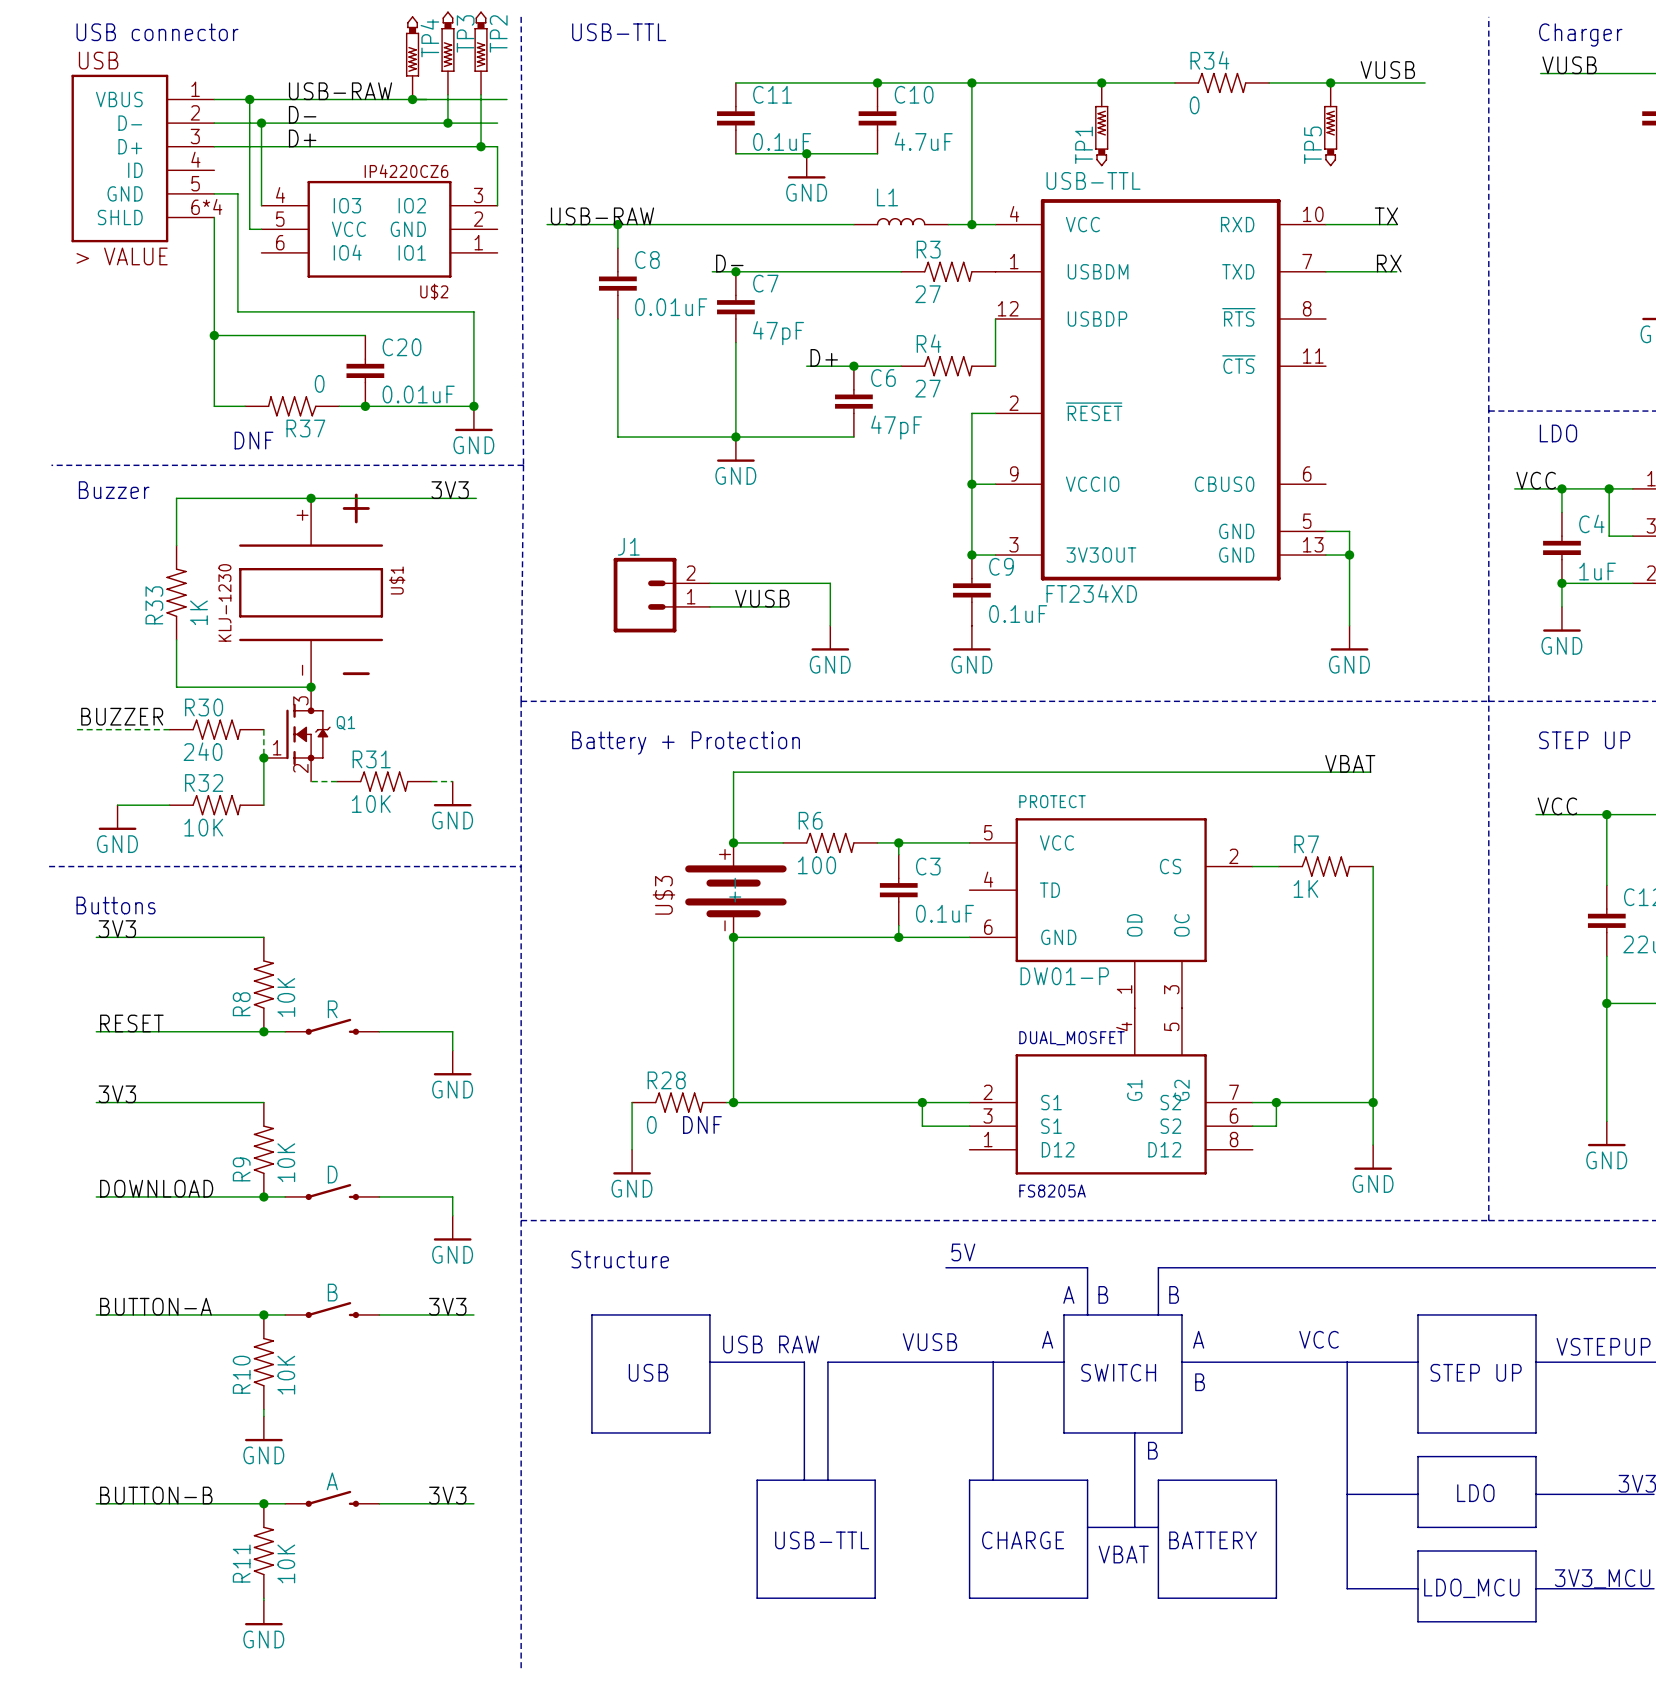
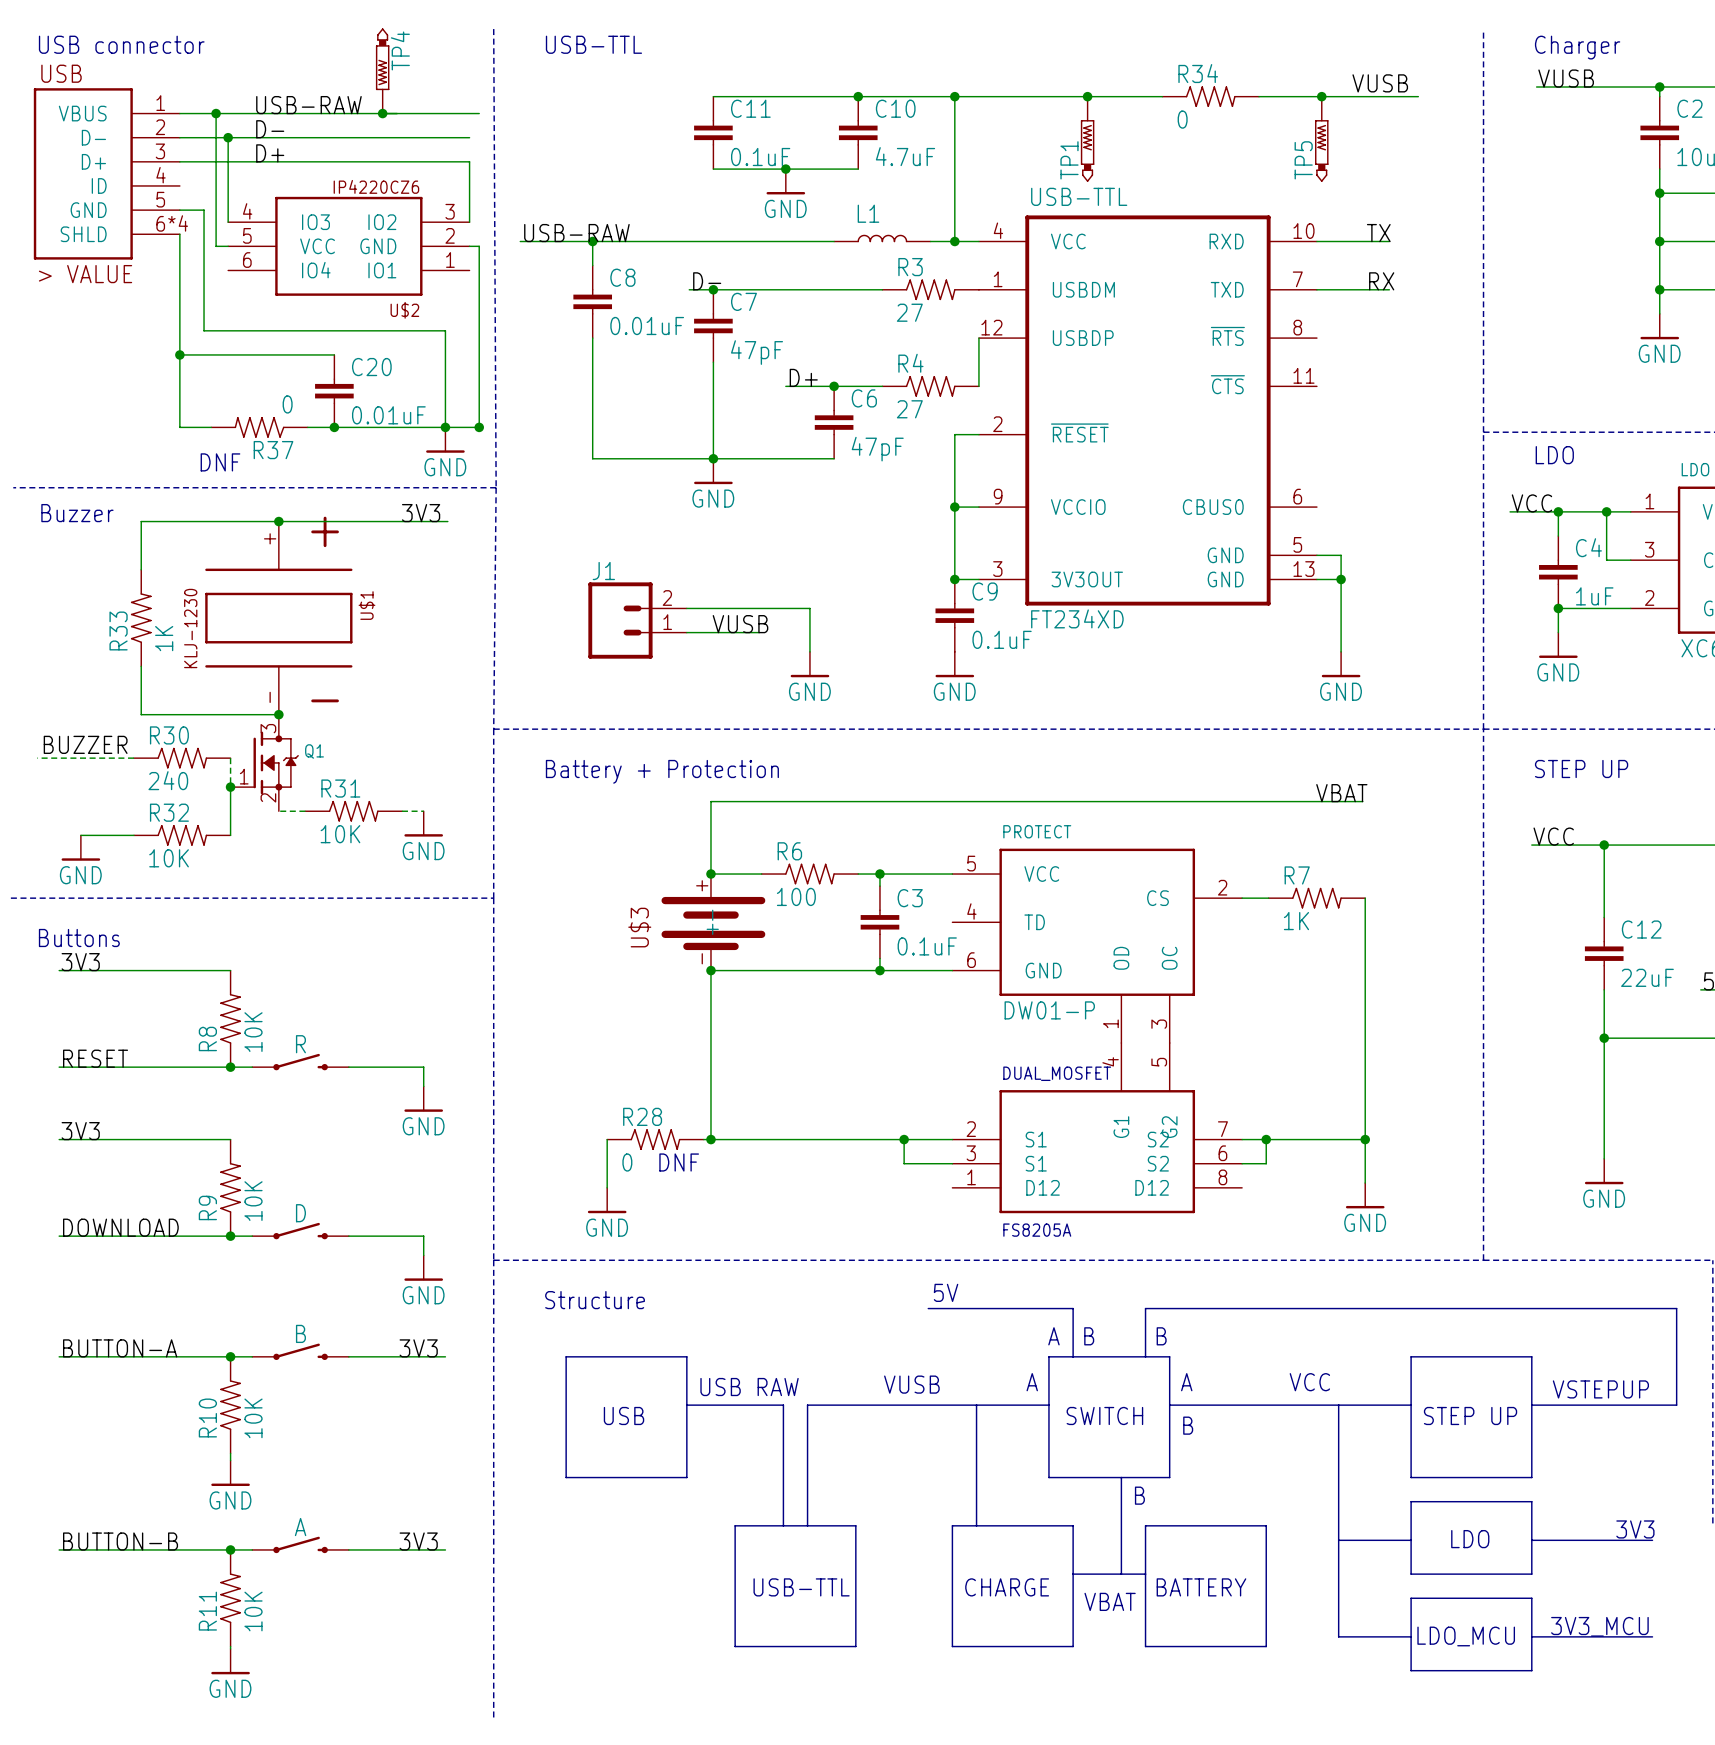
TP3: (447, 53) -> none
TP2: (481, 53) -> none
wire: (447, 94) (447, 123) -> none
wire: (481, 94) (481, 146) -> none
junction: (447, 123) -> none
junction: (481, 146) -> none
wire: none -> (469, 246) (479, 246) (479, 427)
wire: none -> (445, 427) (481, 427)
junction: none -> (479, 427)

